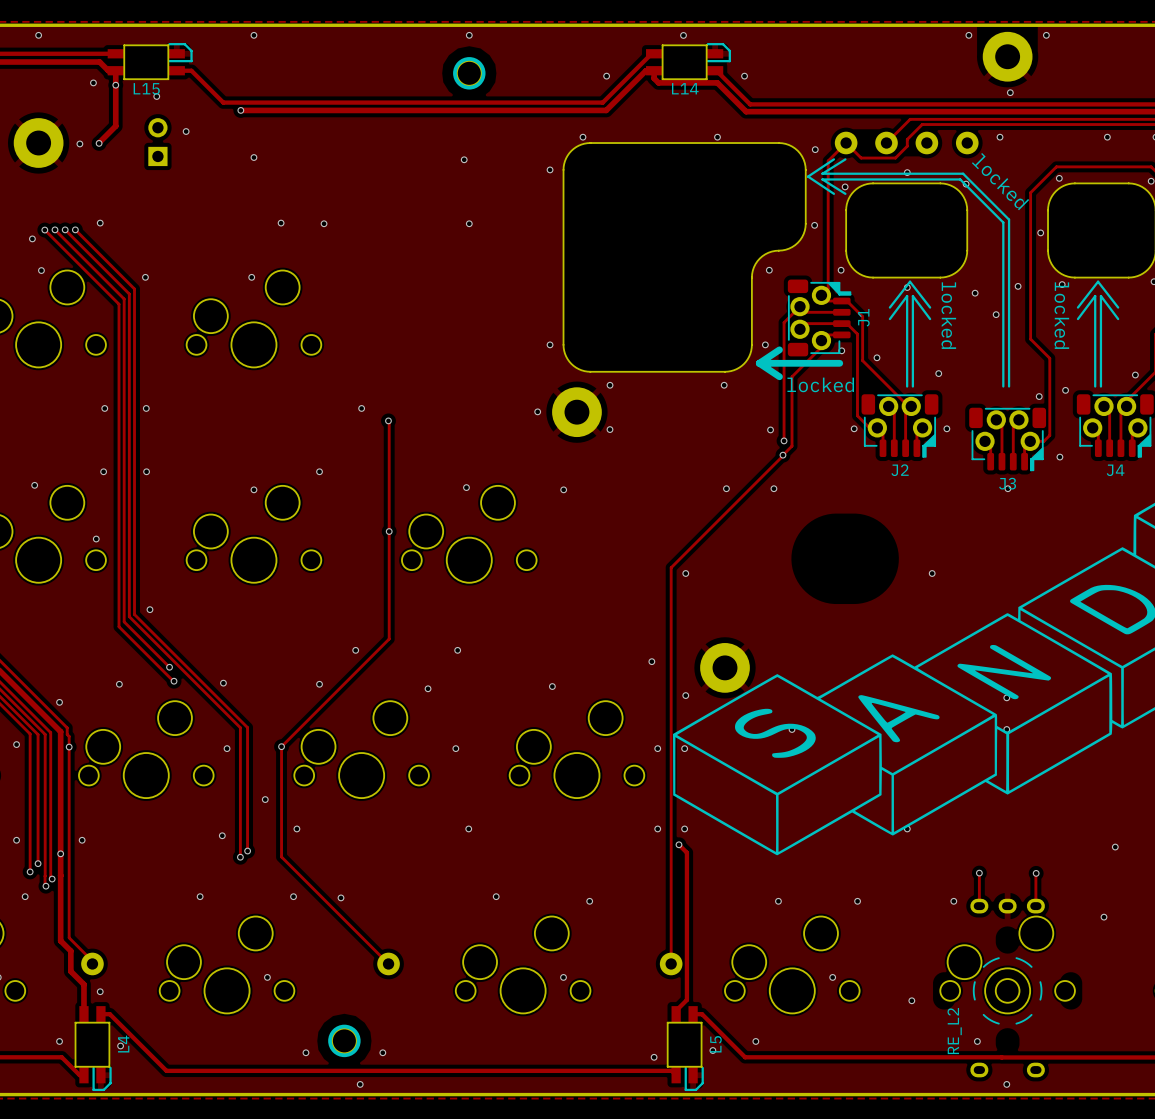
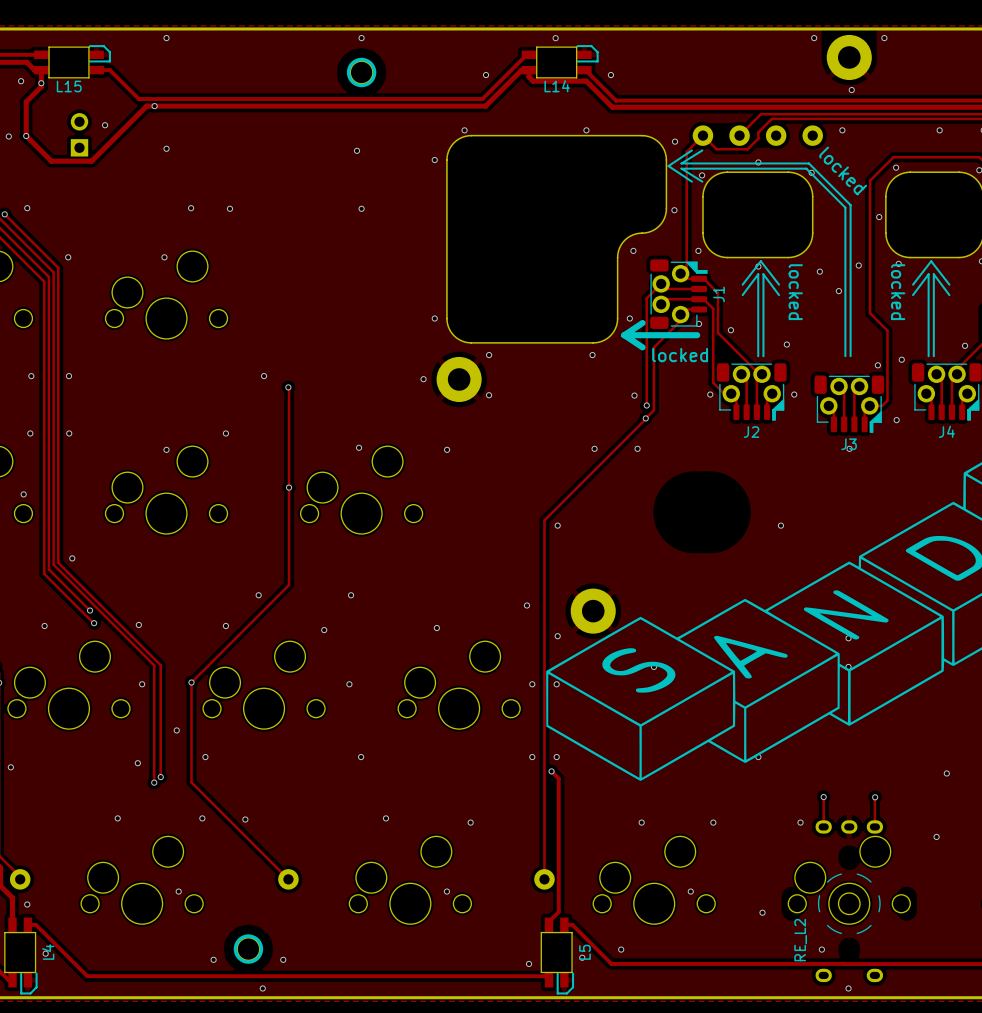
track: (115, 89) (115, 126) (99, 142) -> (41, 86) (26, 101) (26, 135)
via: (156, 96) -> none
track: none -> (154, 106) (146, 106) (91, 161) (51, 161) (26, 135)

